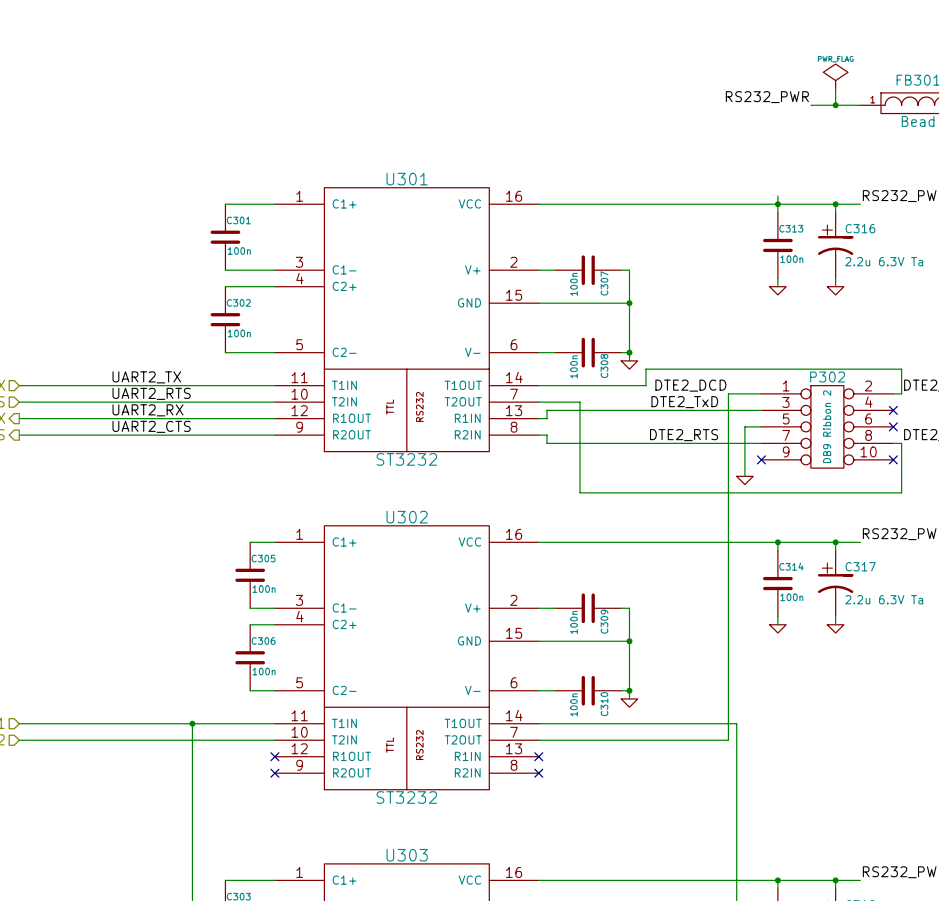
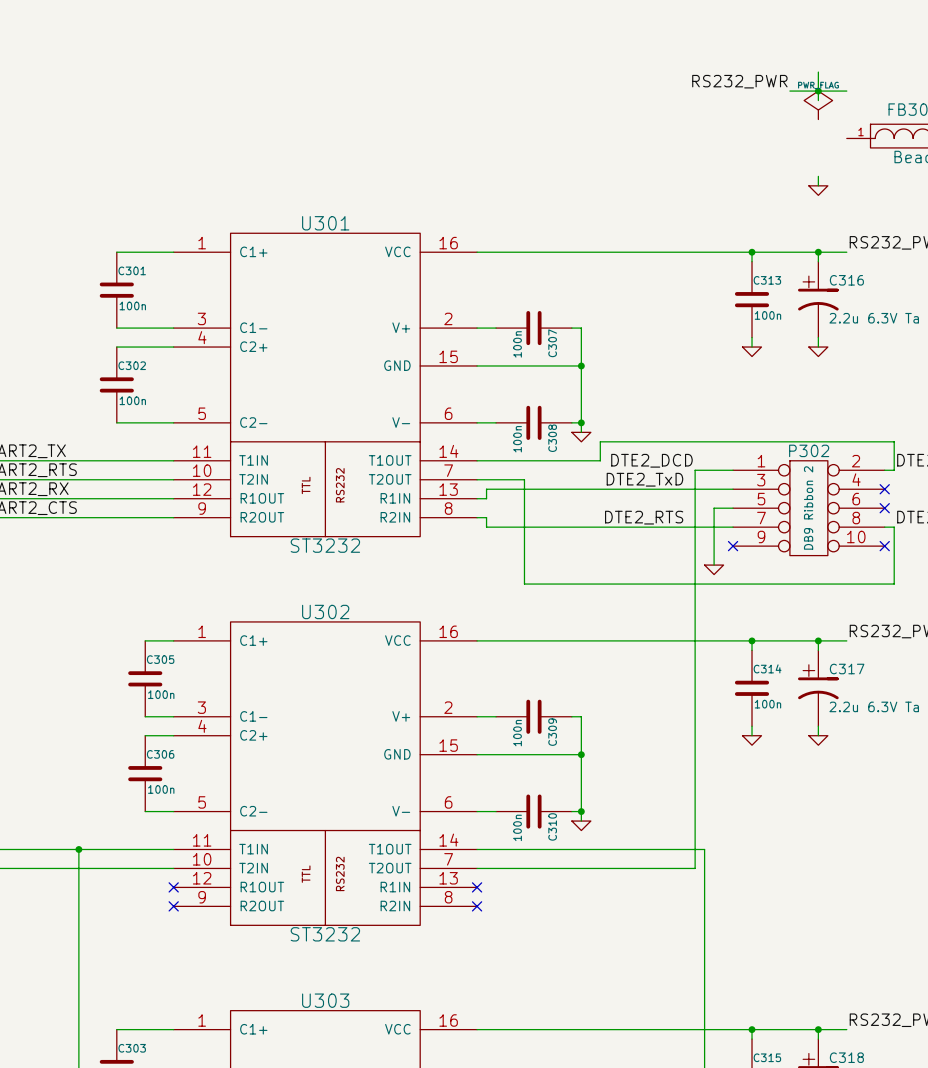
wire: none -> (818, 72) (818, 100)
junction: none -> (818, 91)
wire: (835, 88) (835, 105) -> none
label position: RS232_PWR (767, 97) -> RS232_PWR (739, 81)
wire: (810, 105) (860, 105) -> (789, 91) (846, 91)
junction: (835, 105) -> none
power symbol: none -> (818, 190)
wire: (777, 195) (777, 204) -> (818, 176) (818, 185)

